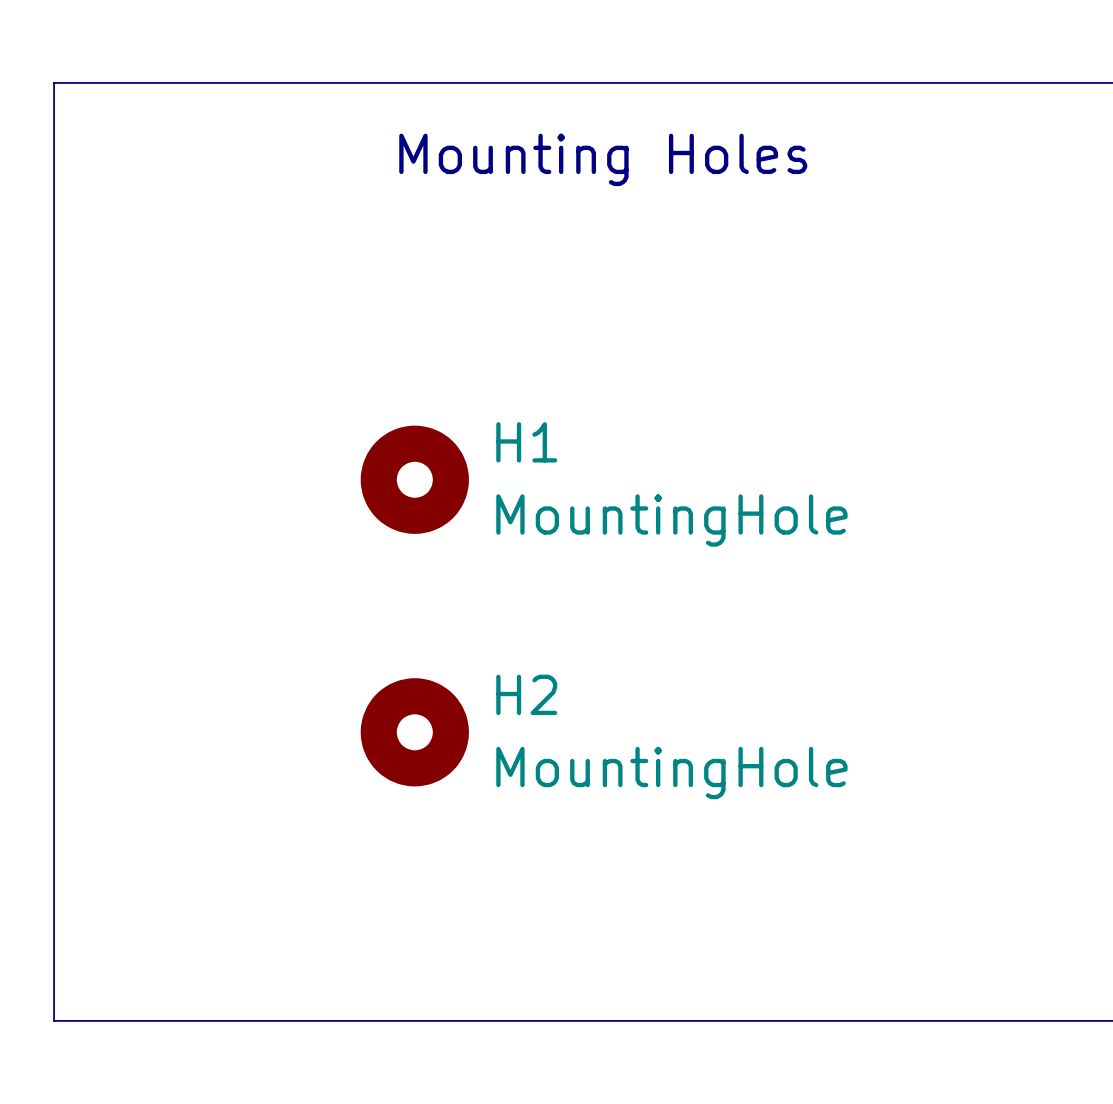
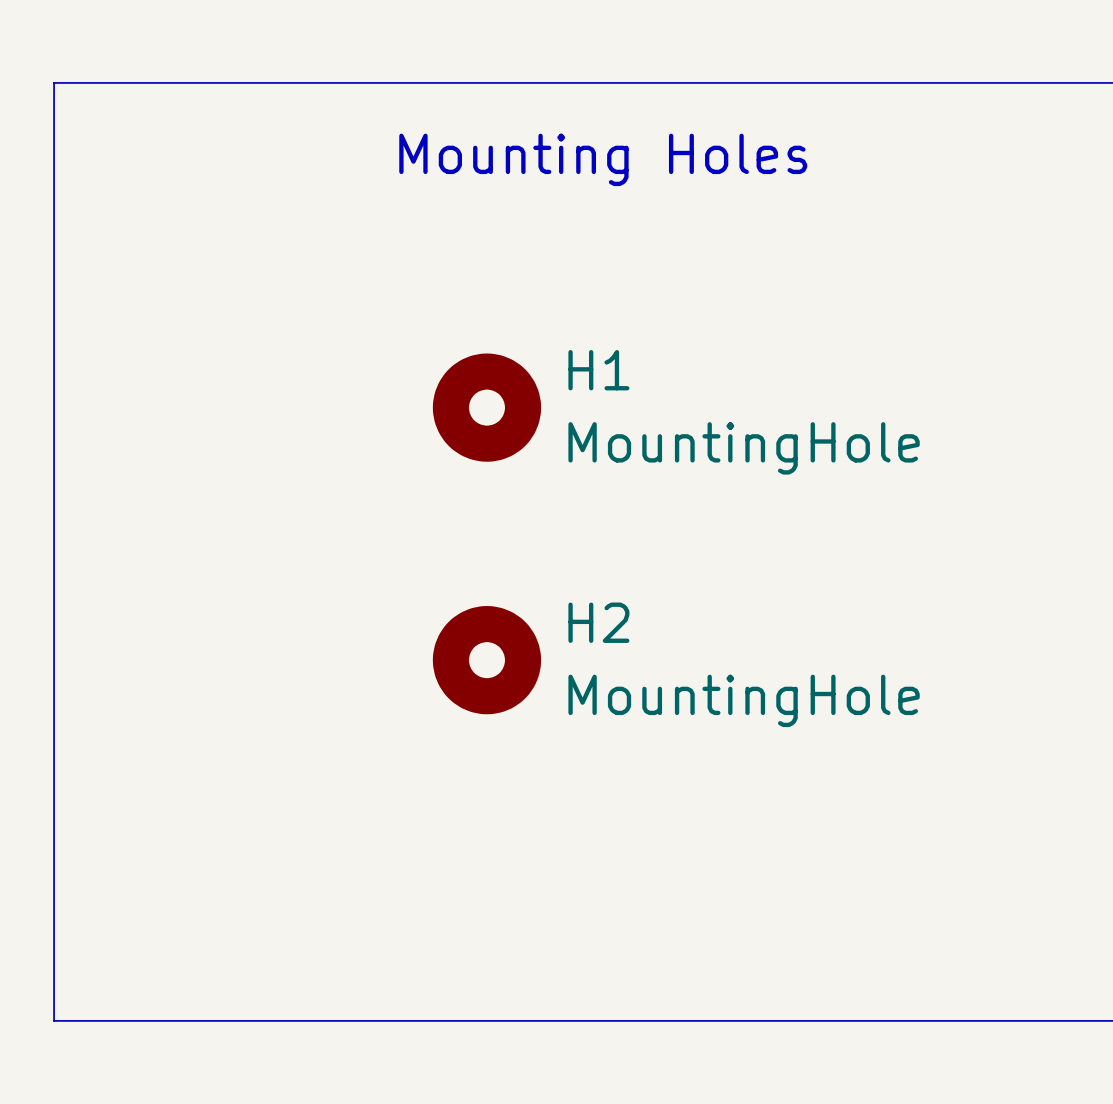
H1 position: (414, 479) -> (486, 407)
H2 position: (414, 732) -> (486, 660)

